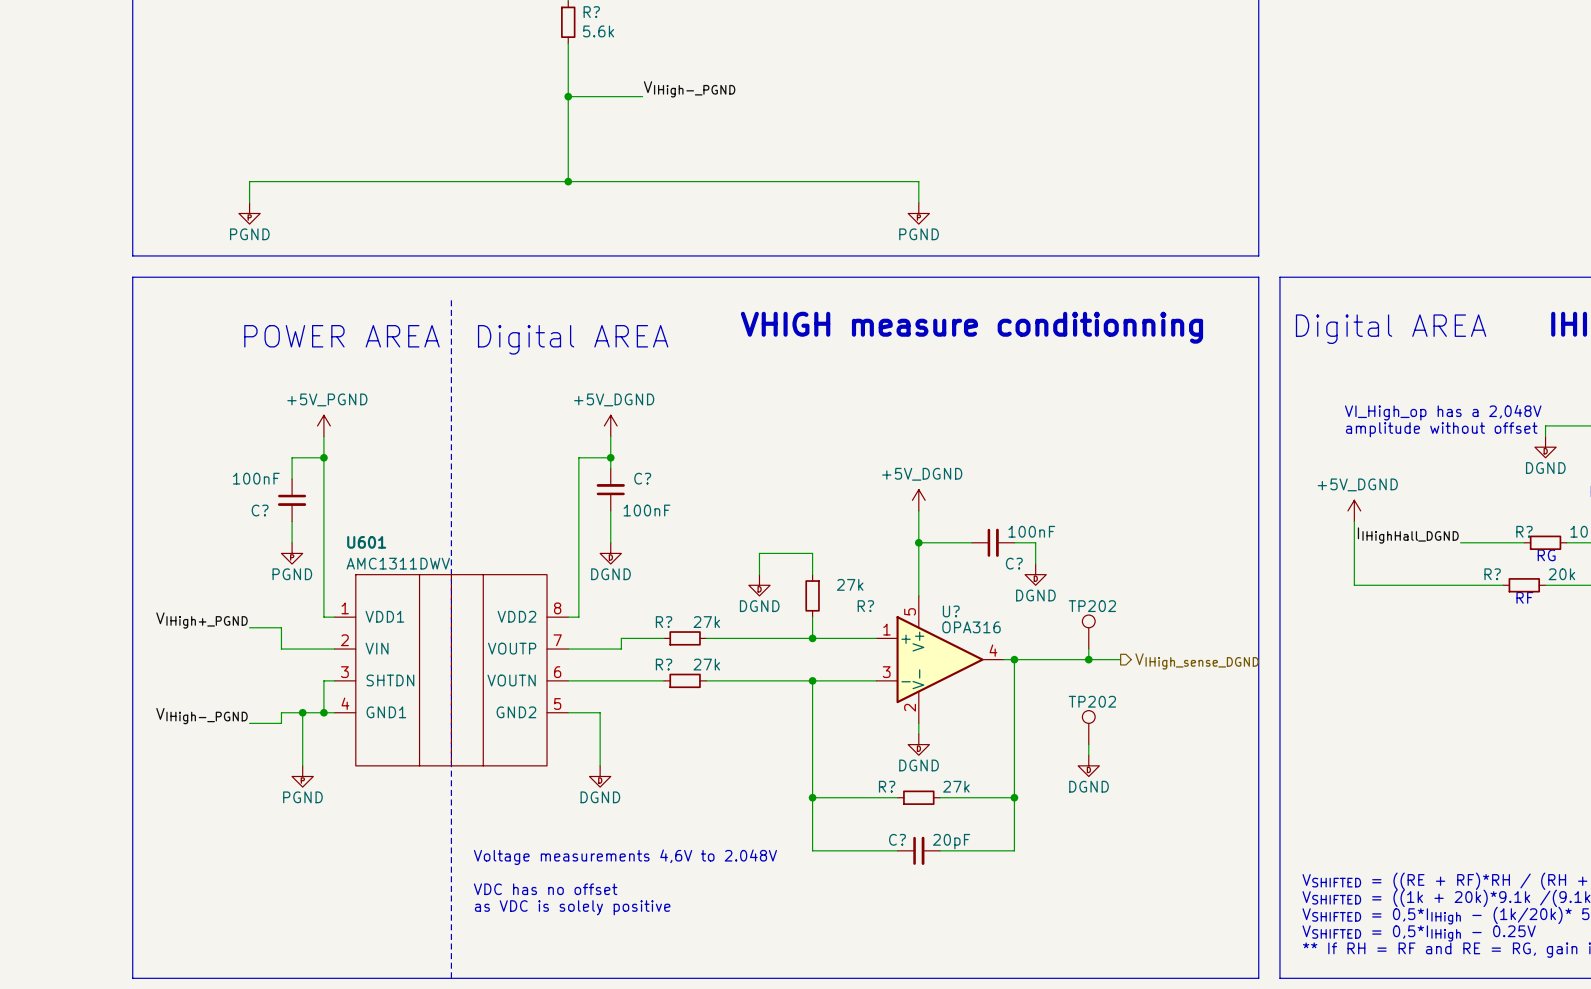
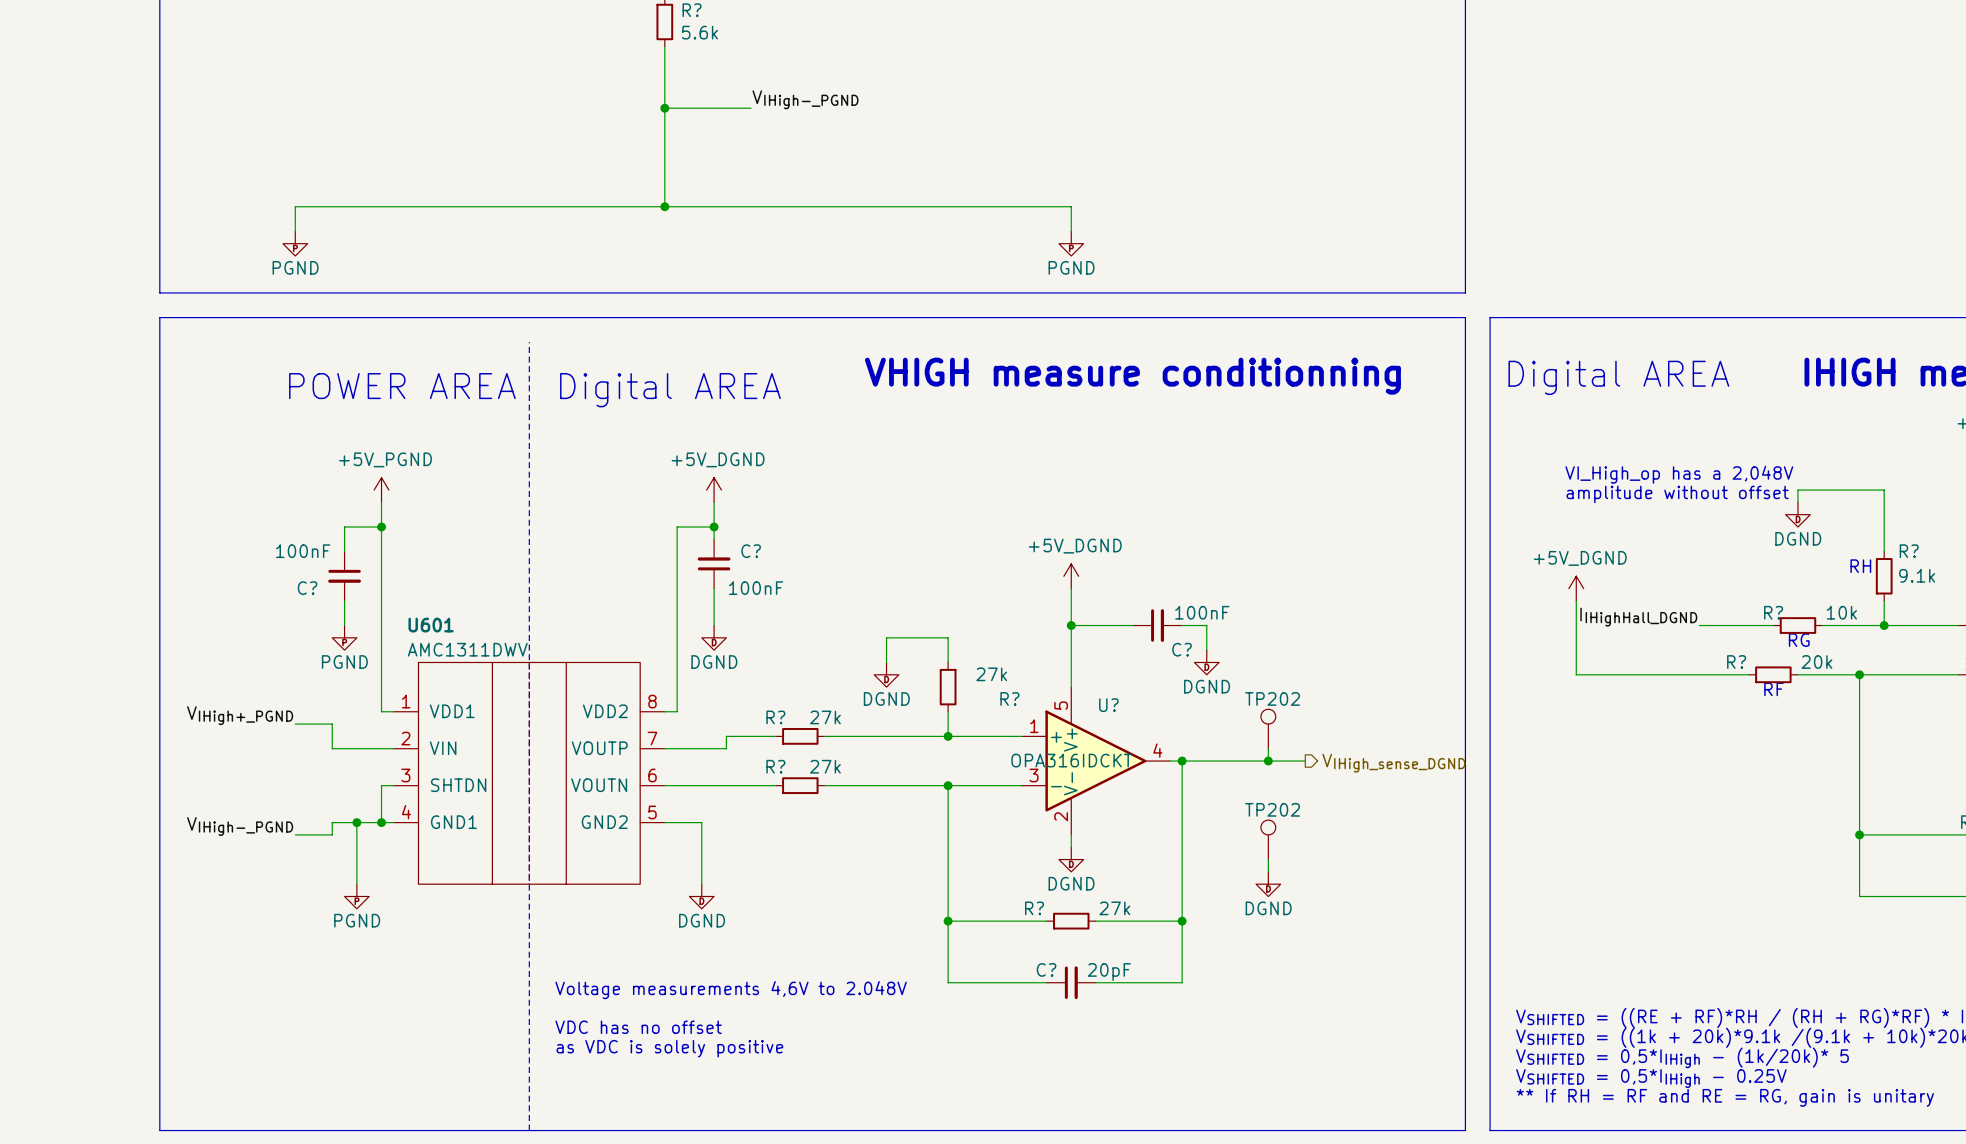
U? value: OPA316 (971, 627) -> none
U? text: none -> OPA316IDCKT (1071, 760)

